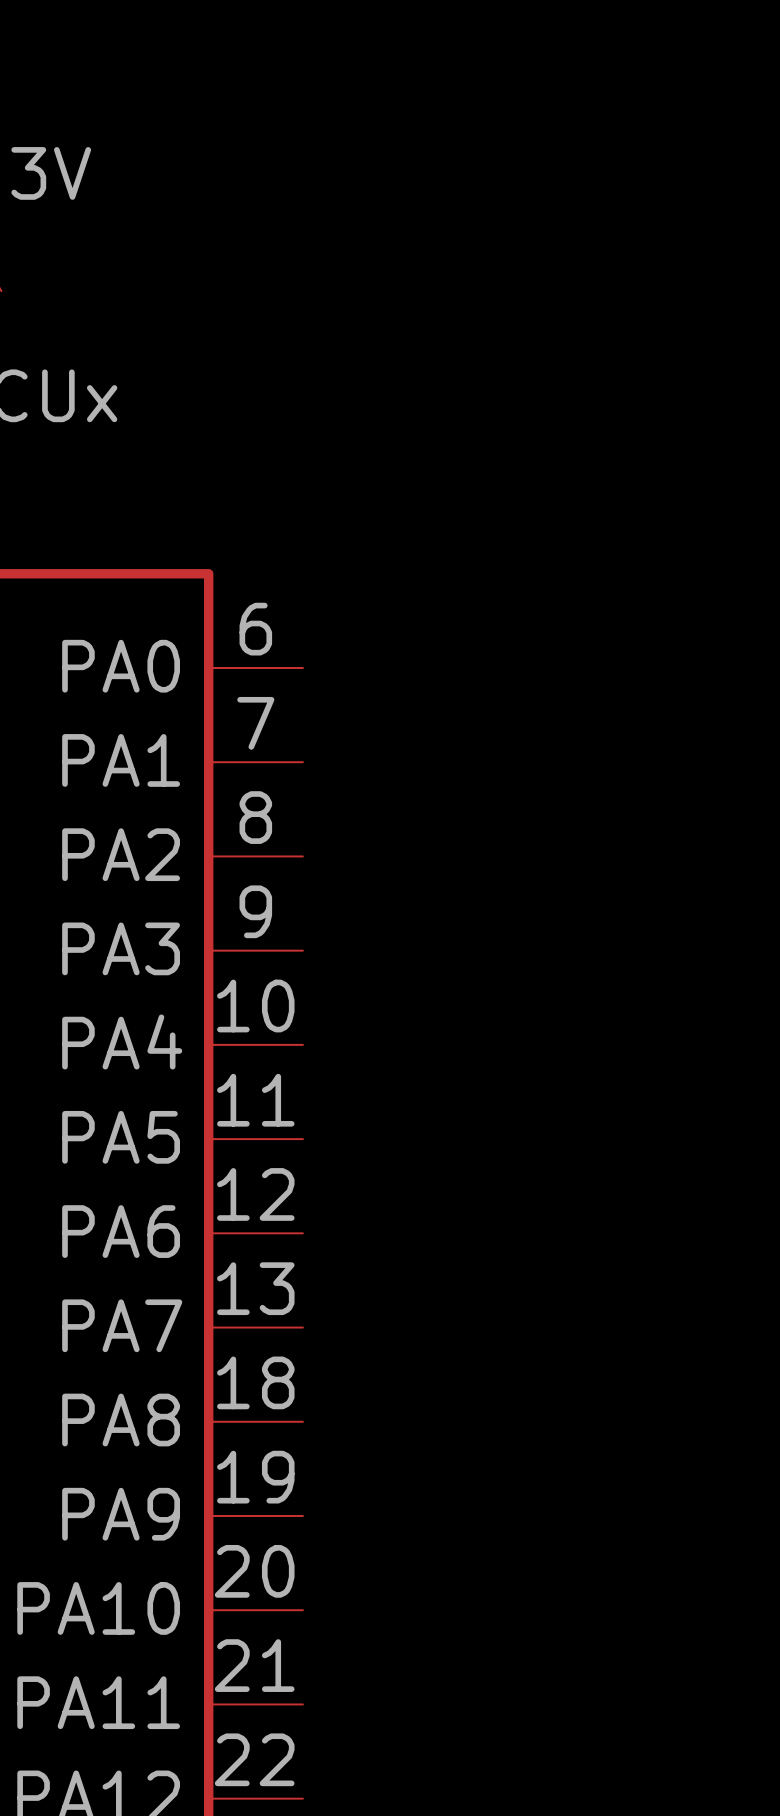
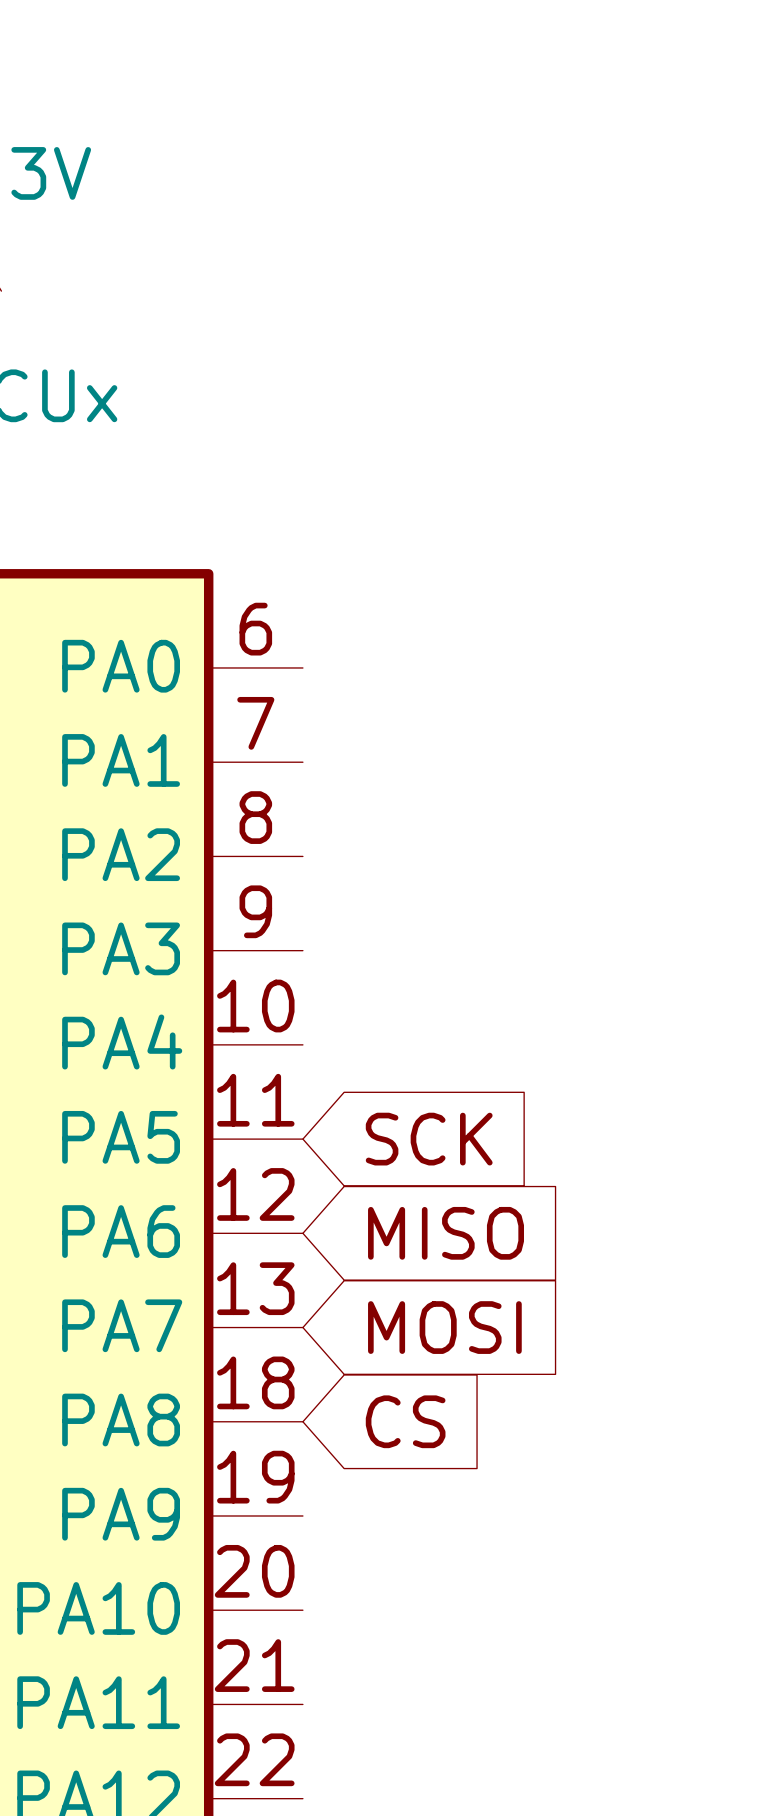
global label: none -> SCK (429, 1139)
global label: none -> MISO (446, 1233)
global label: none -> MOSI (444, 1327)
global label: none -> CS (405, 1421)

